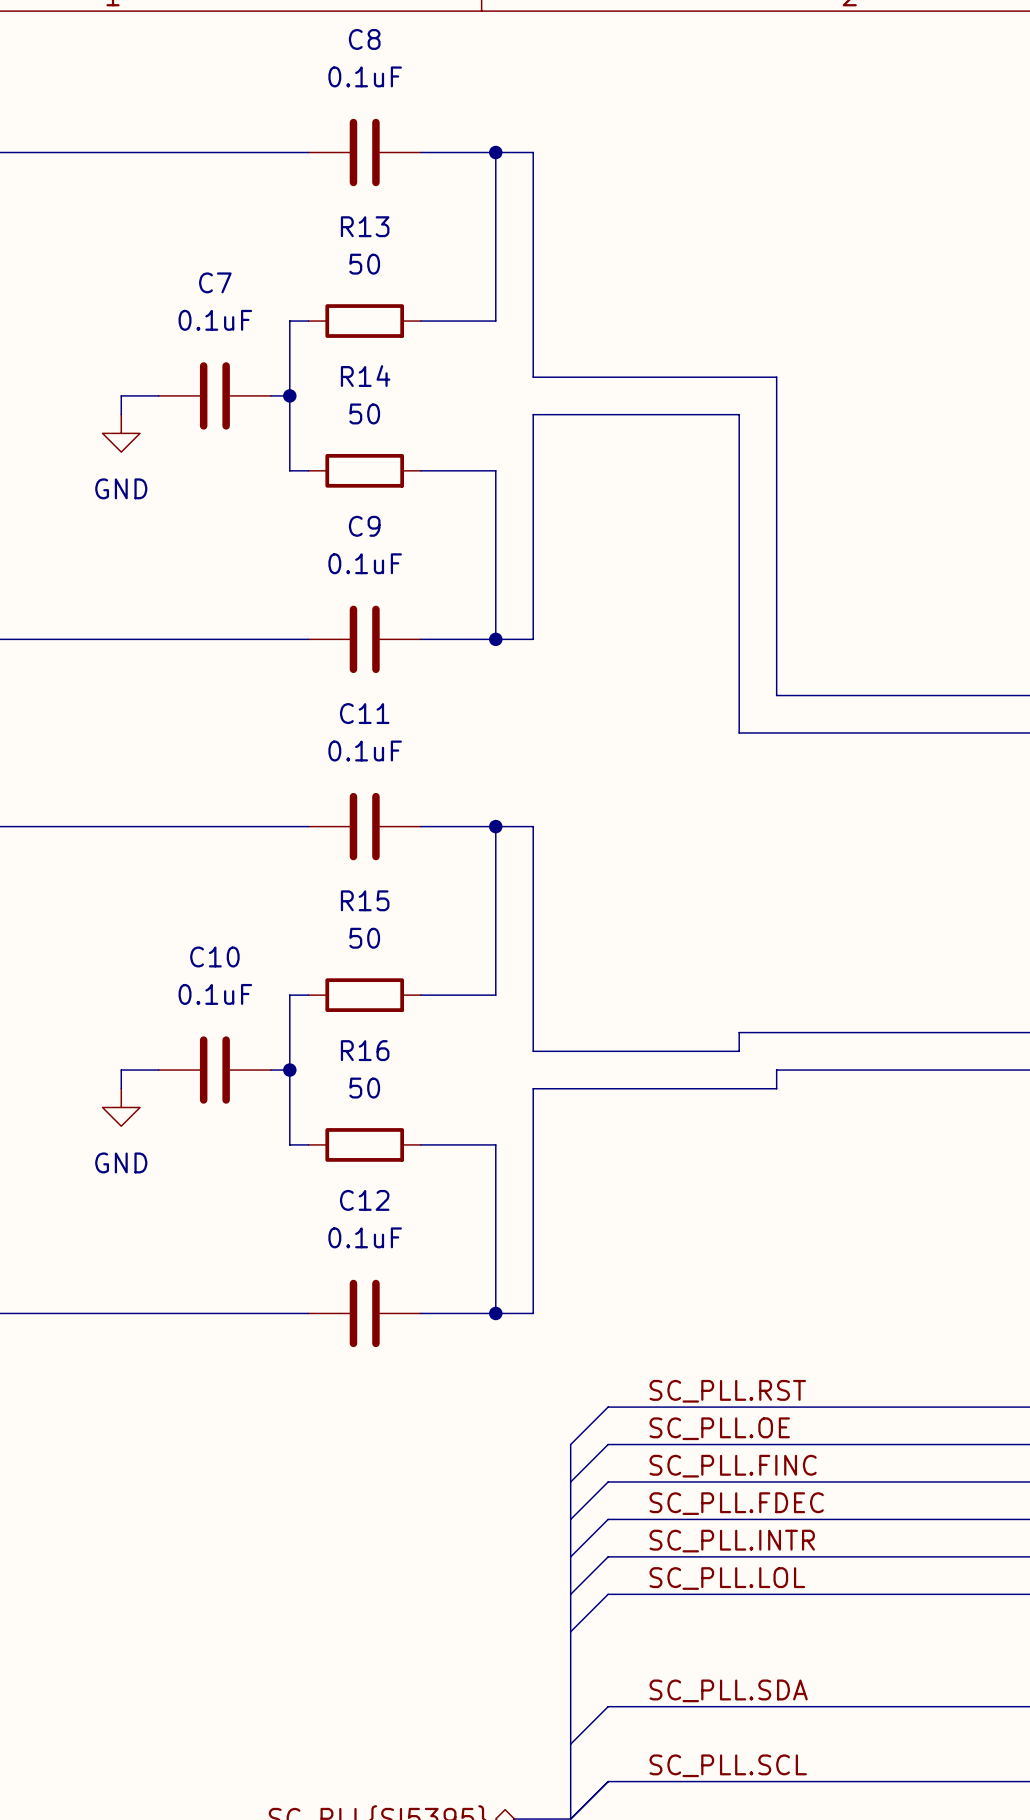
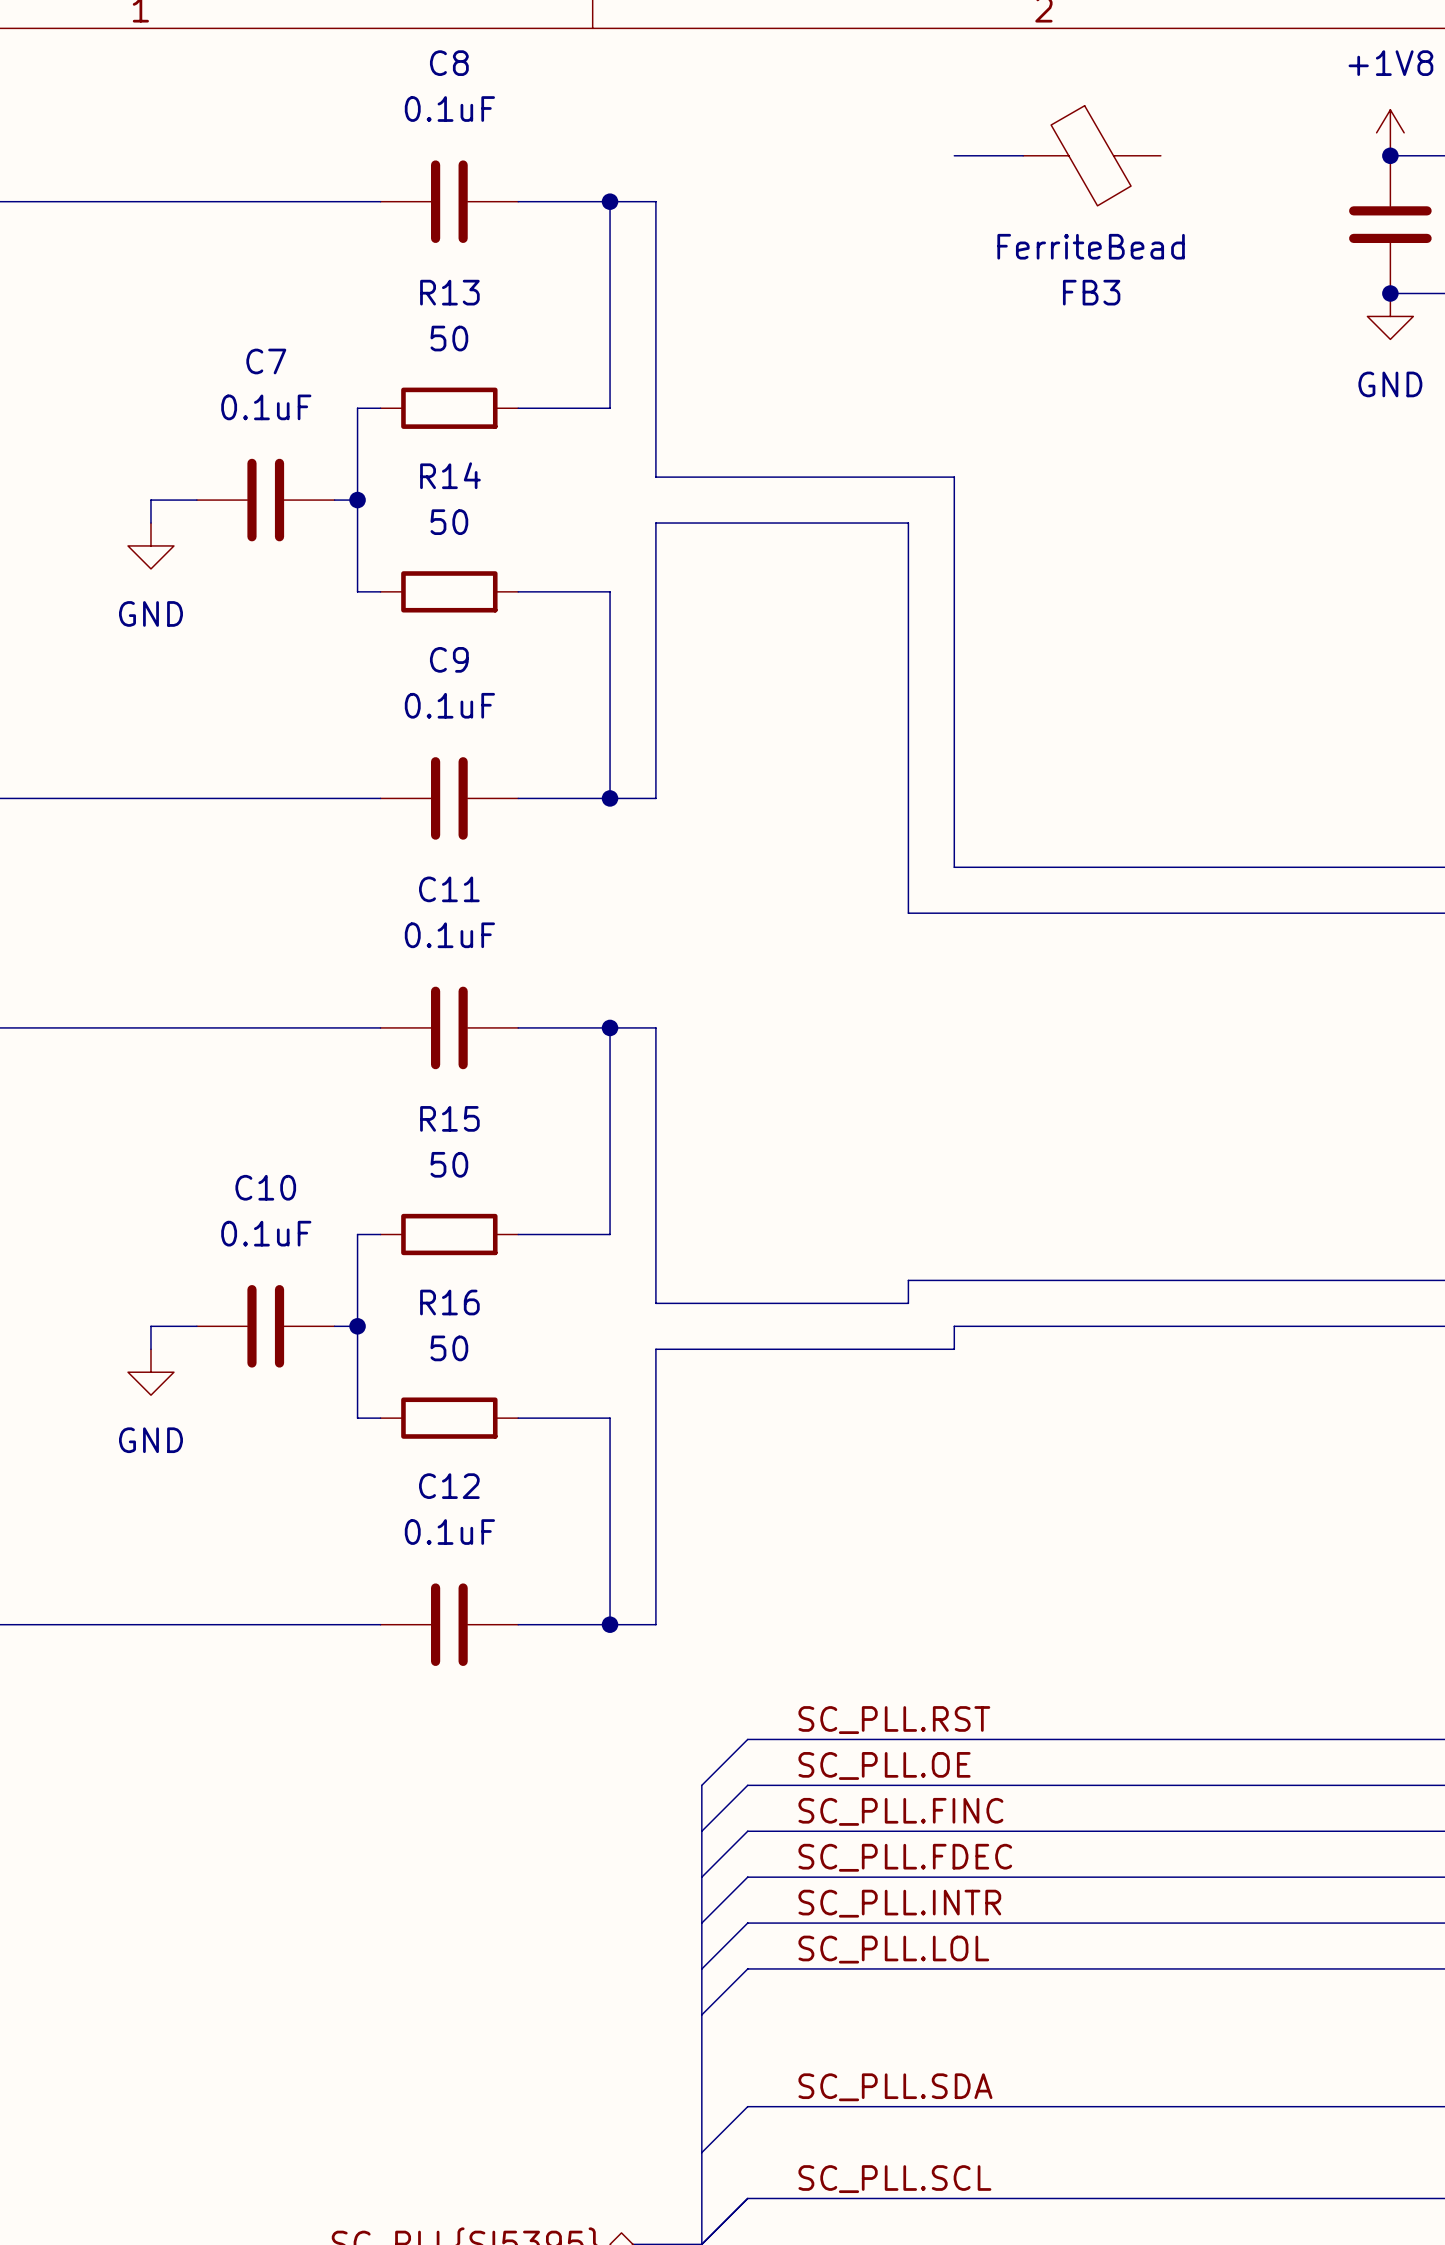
wire: none -> (954, 155) (1023, 155)
FB3: none -> FerriteBead (1092, 155)

